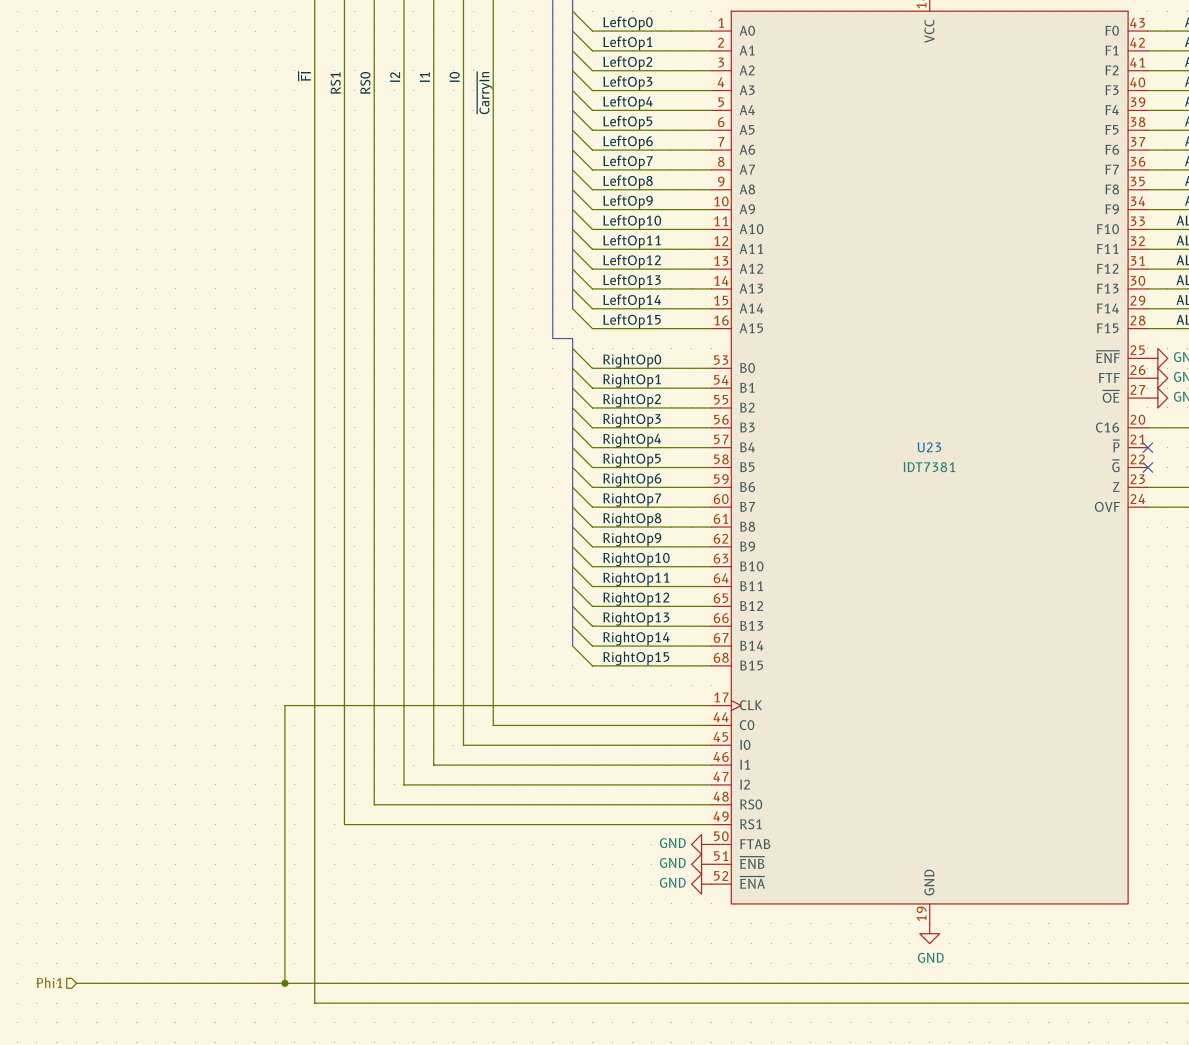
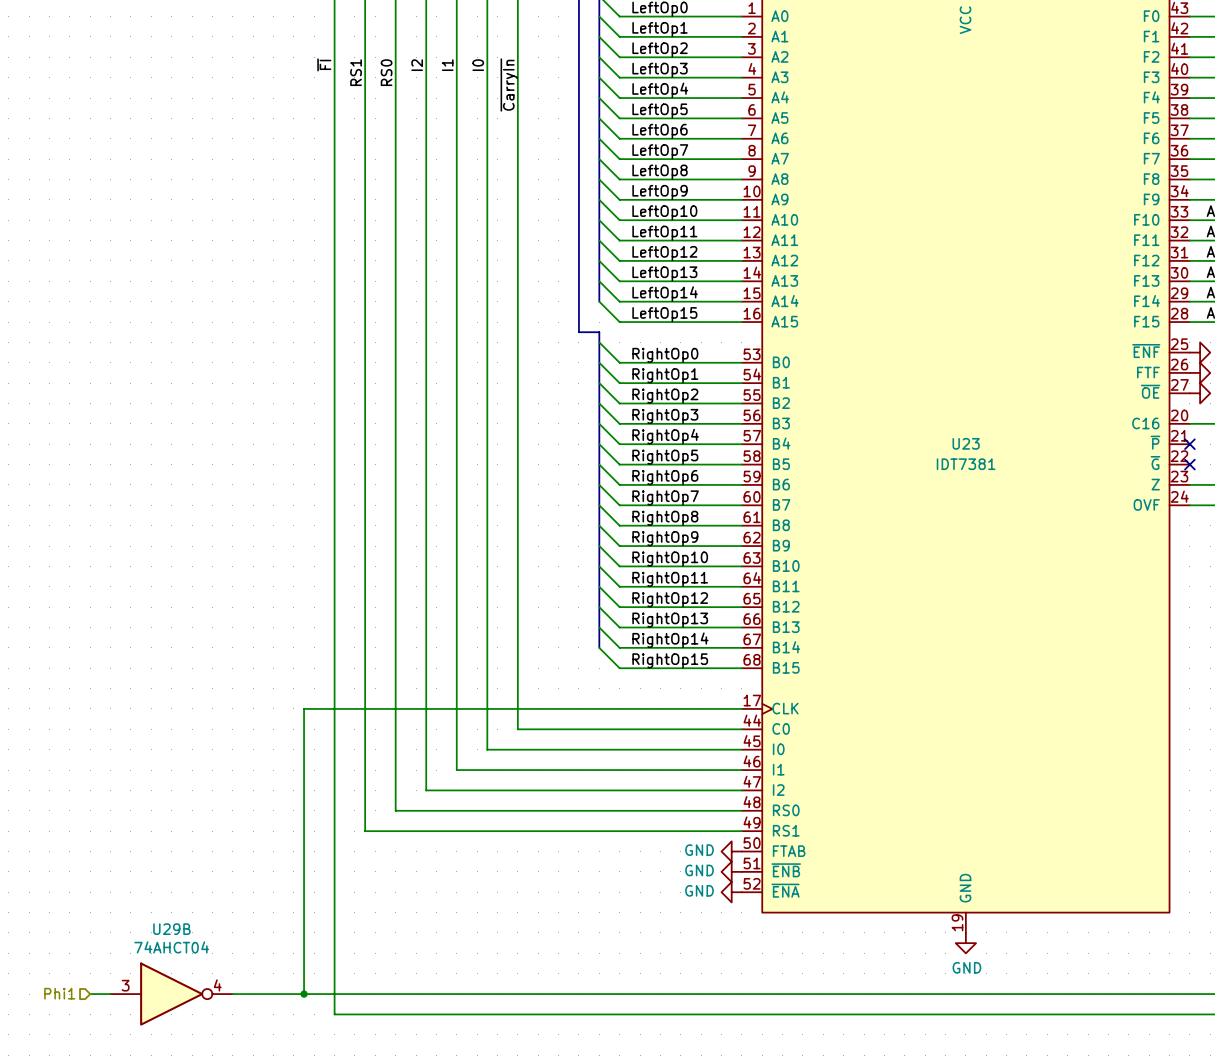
U29B: none -> 74AHCT04 (171, 994)

